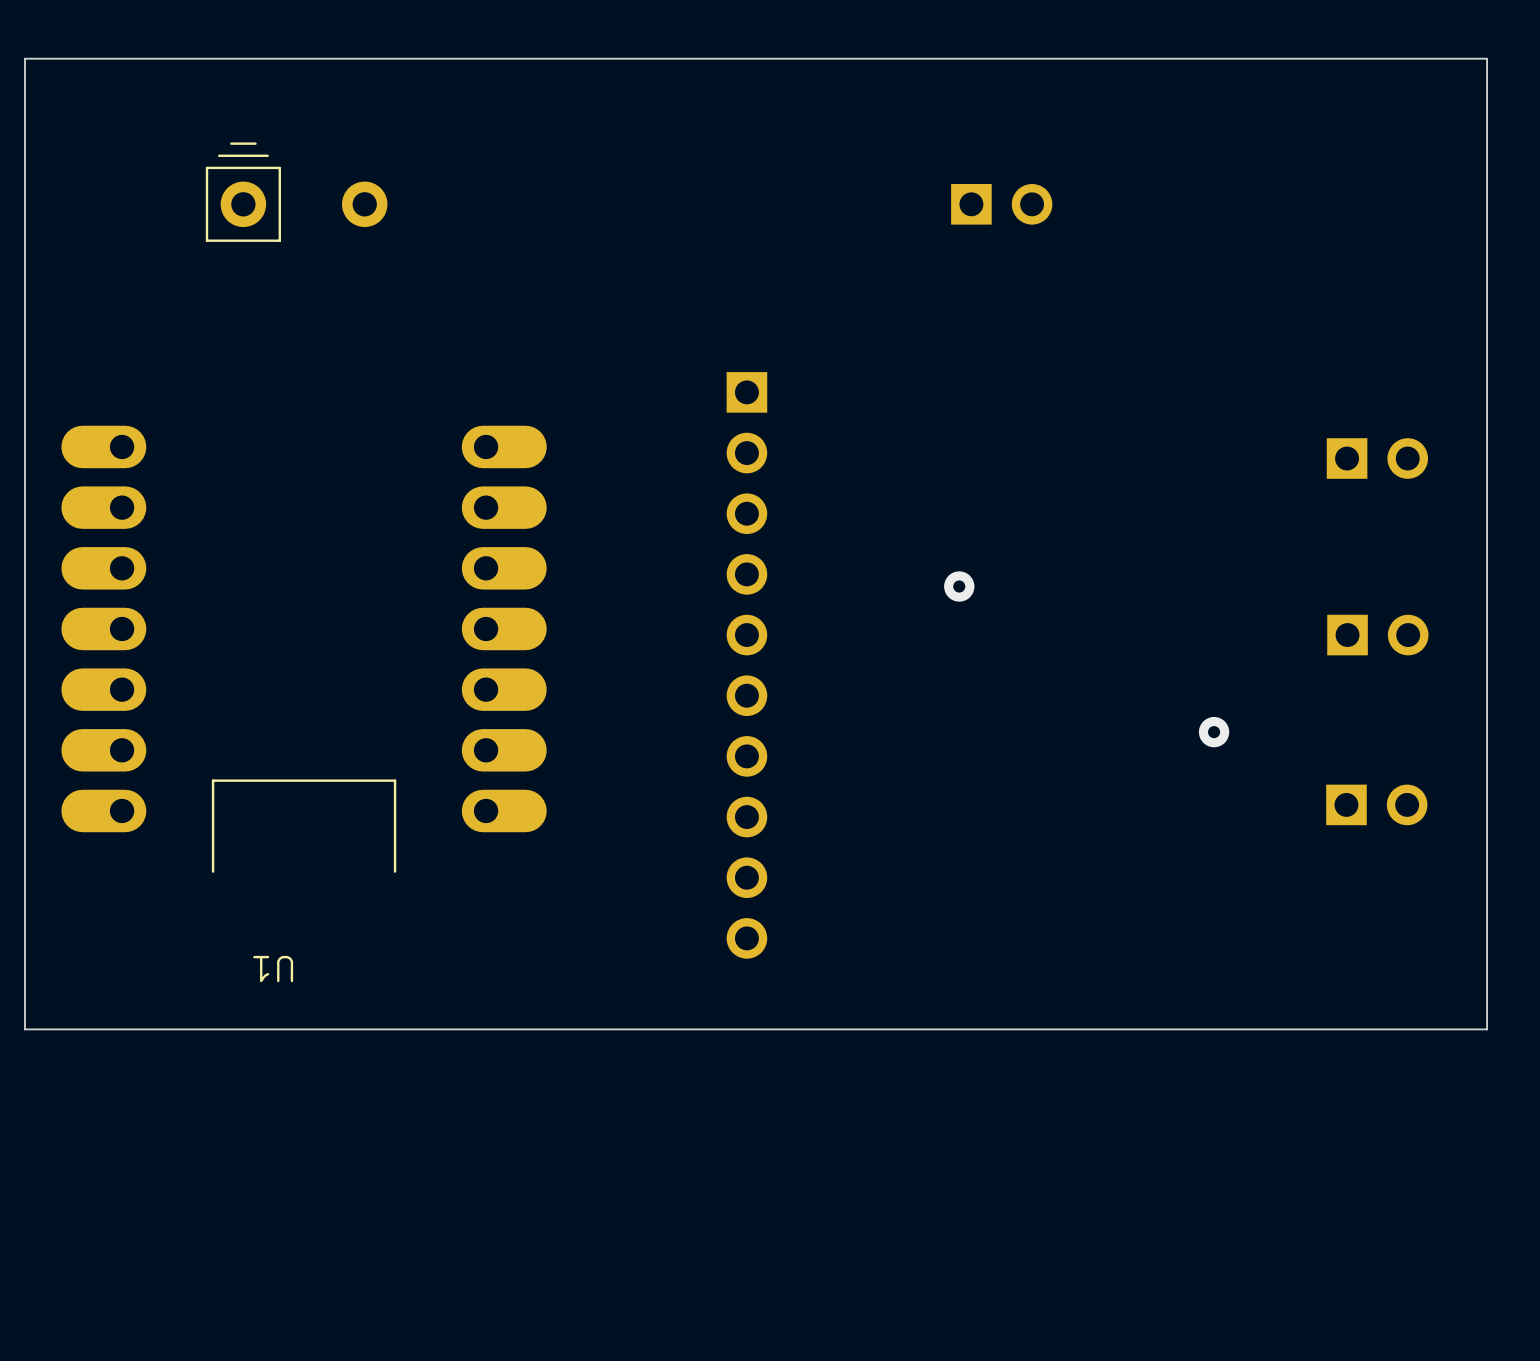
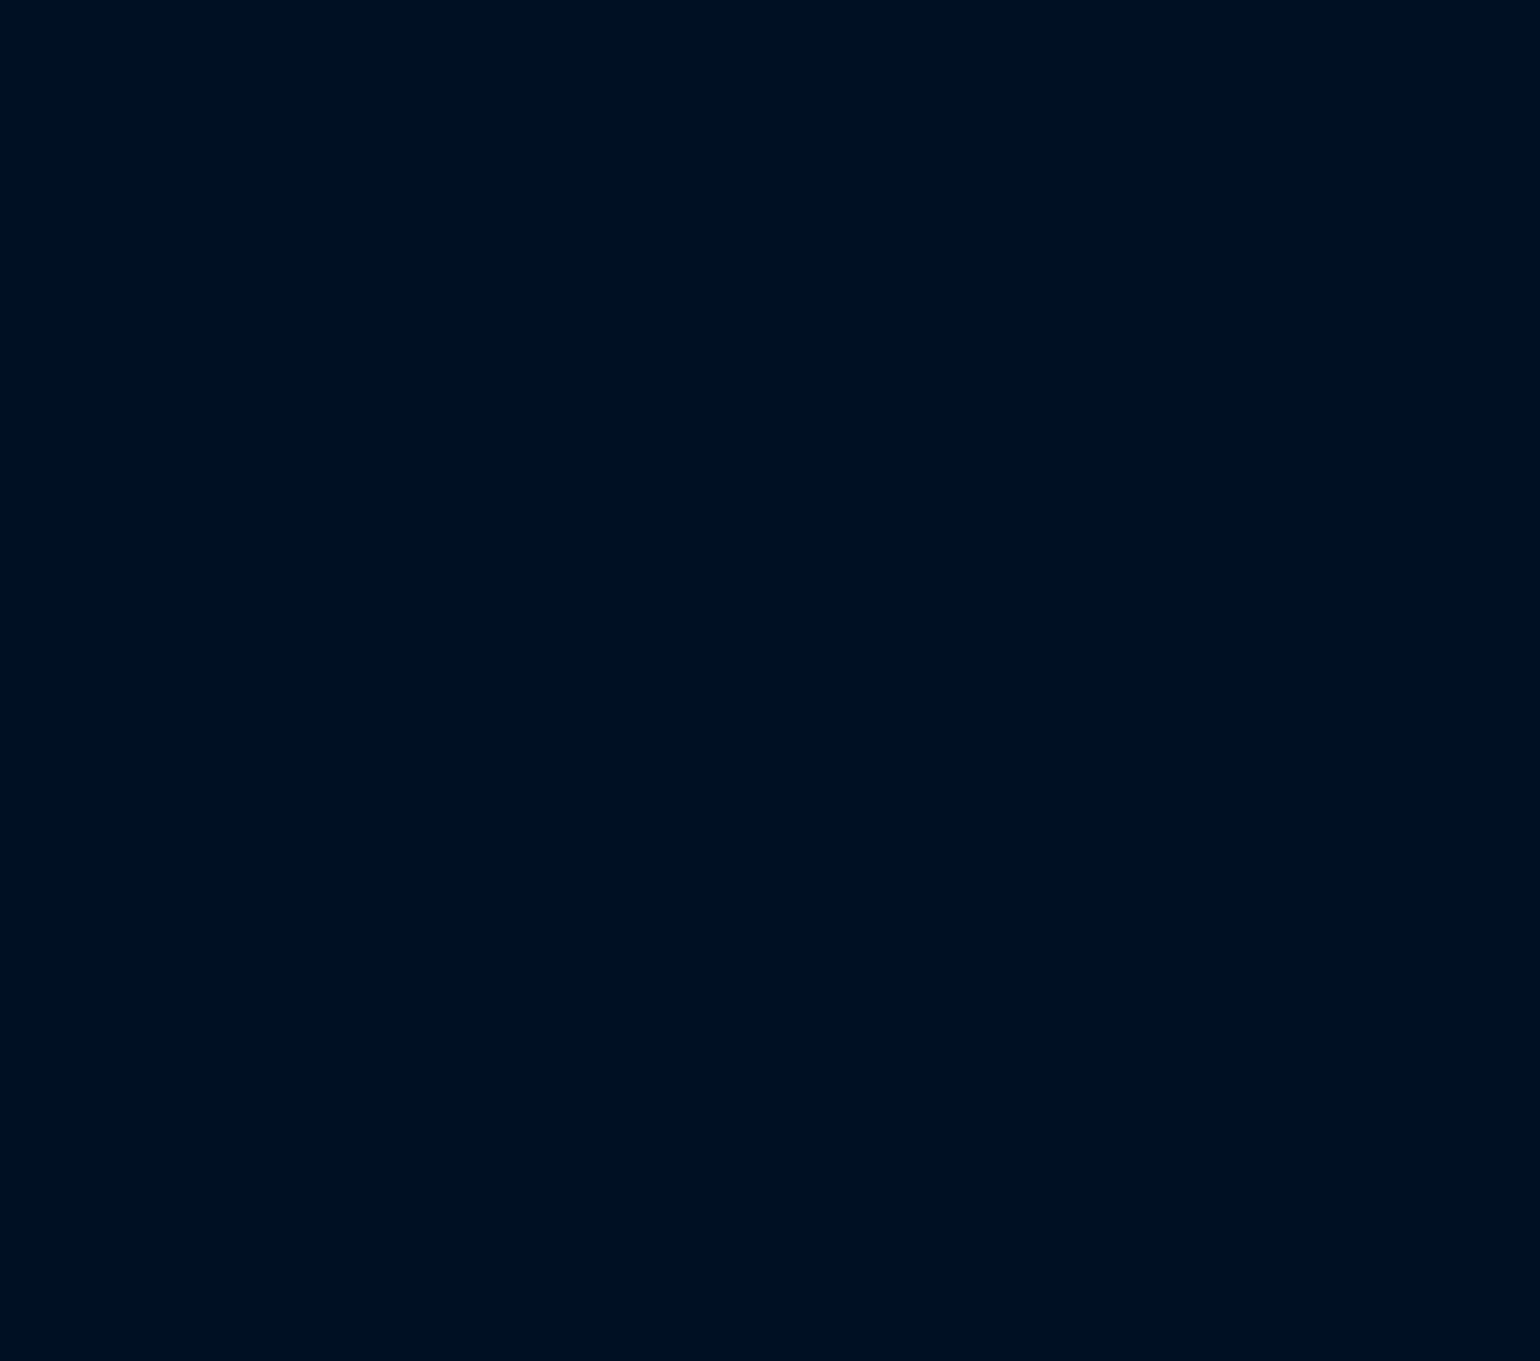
board edge: (1487, 58) (24, 58) (24, 1029) (1487, 1029) (1487, 58) -> none
part: (1001, 204) -> none
part: (1377, 458) -> none
U1: (304, 507) -> none
via: (959, 586) -> none
part: (1377, 635) -> none
part: (746, 665) -> none
via: (1214, 732) -> none
part: (1376, 804) -> none

